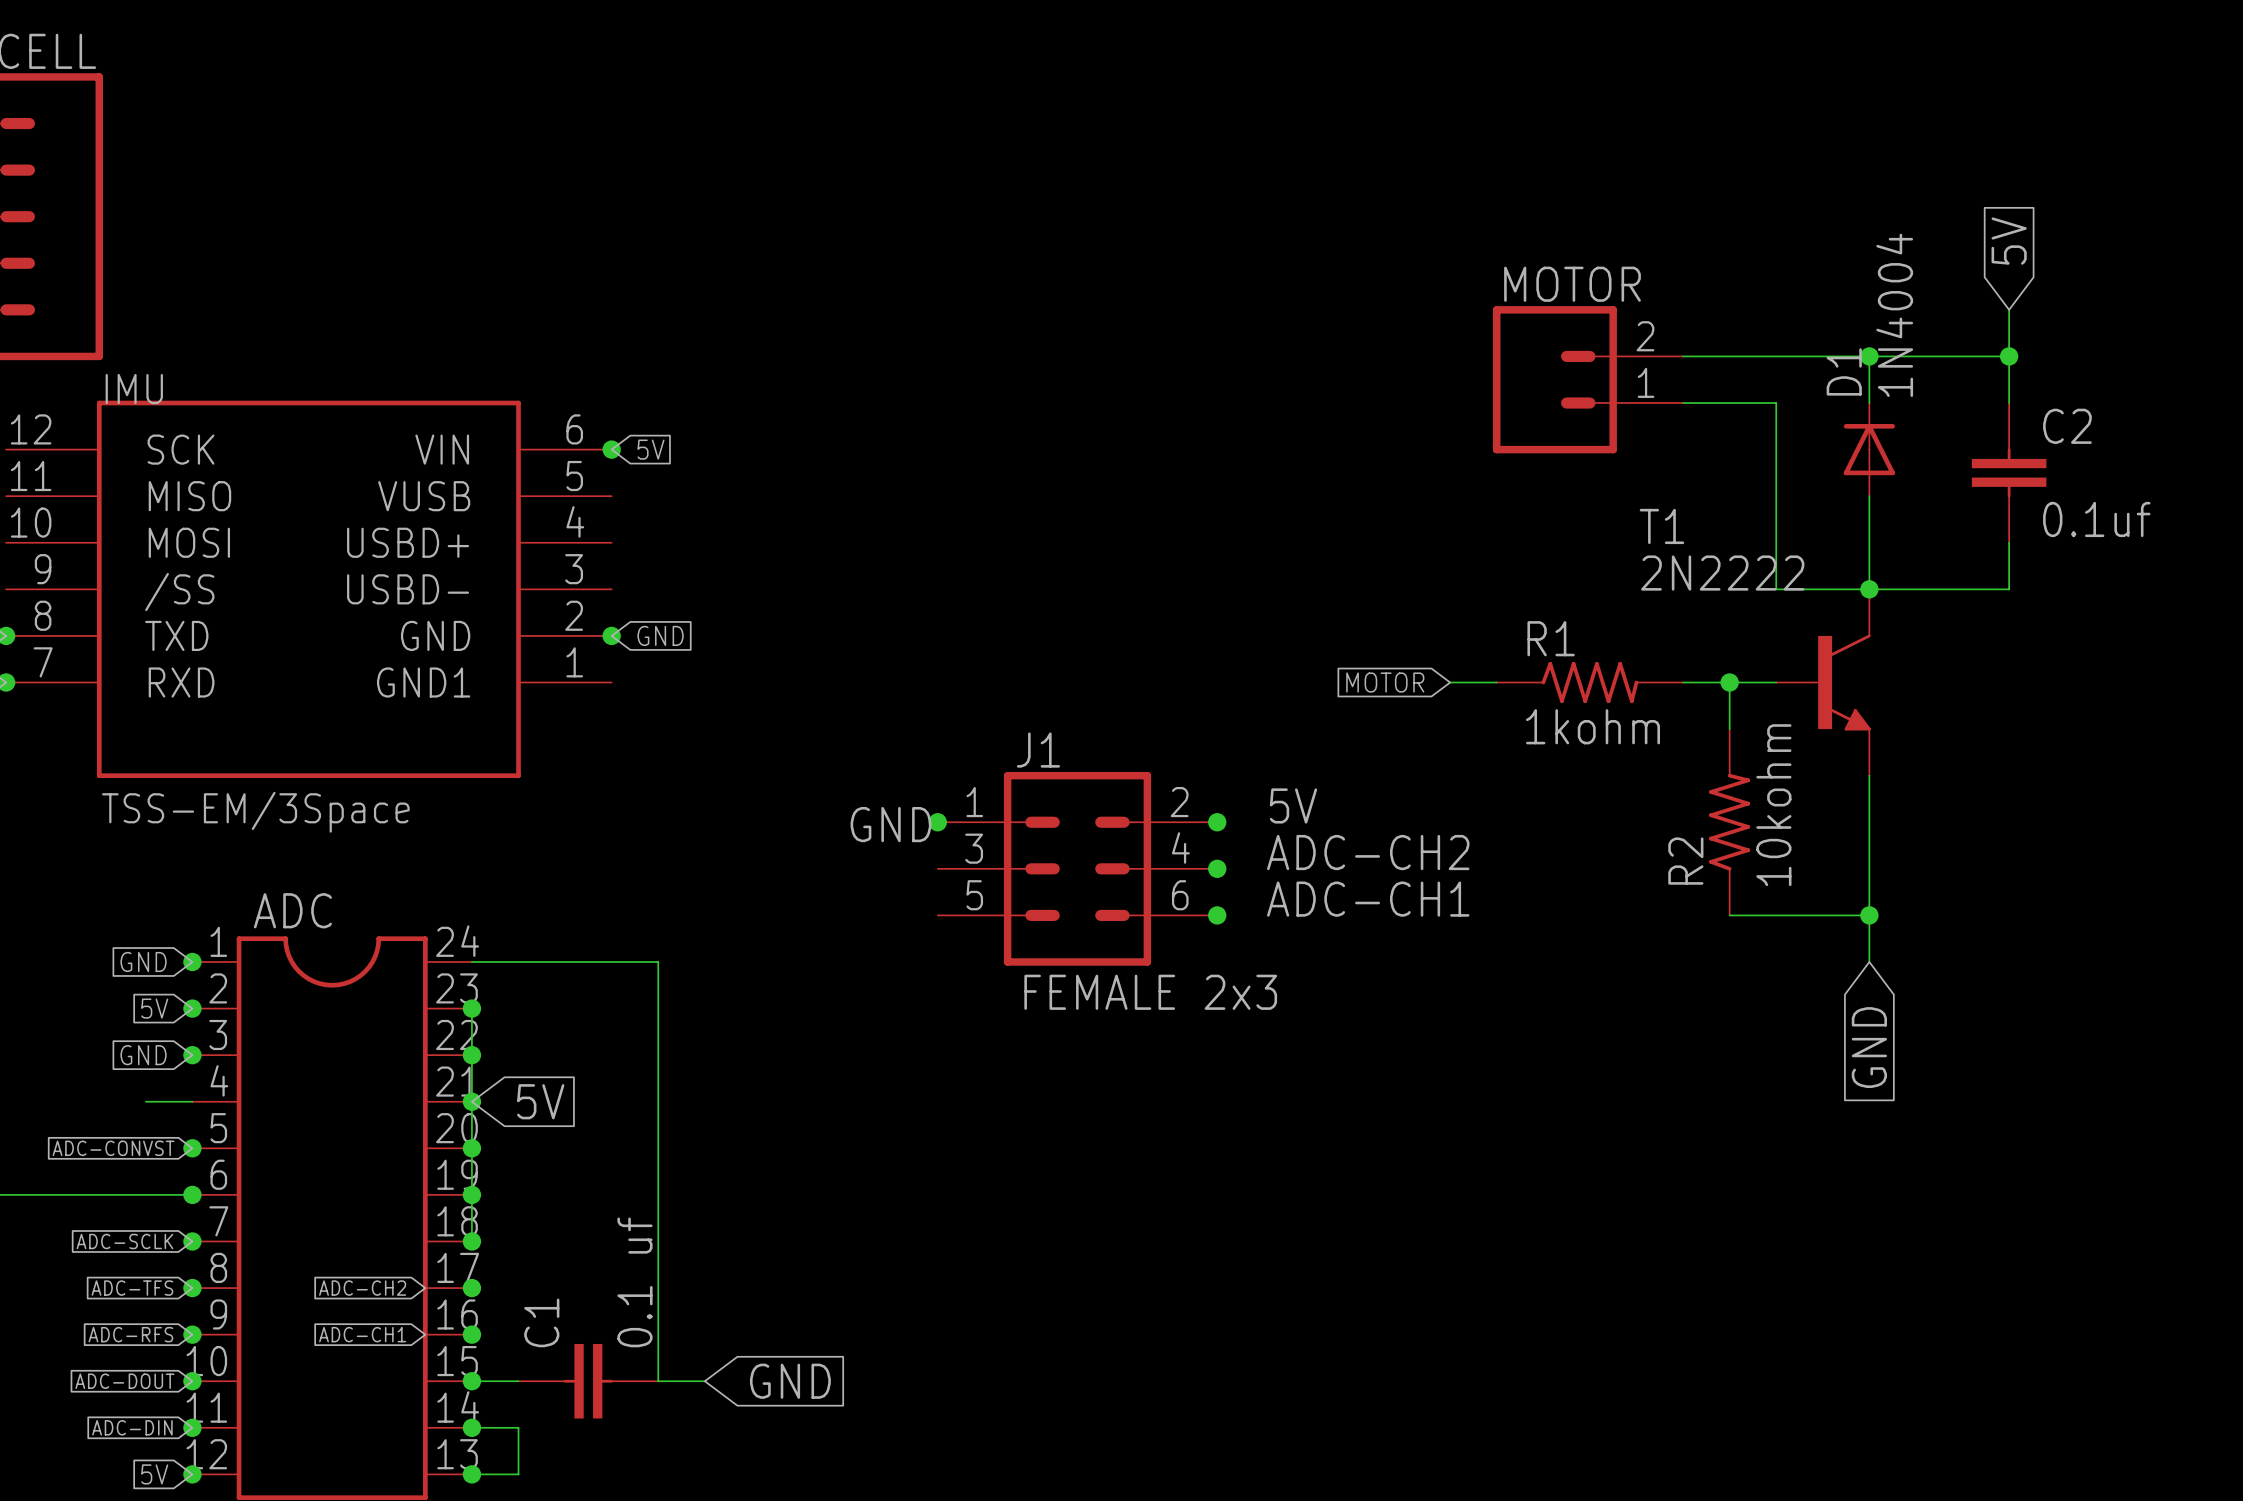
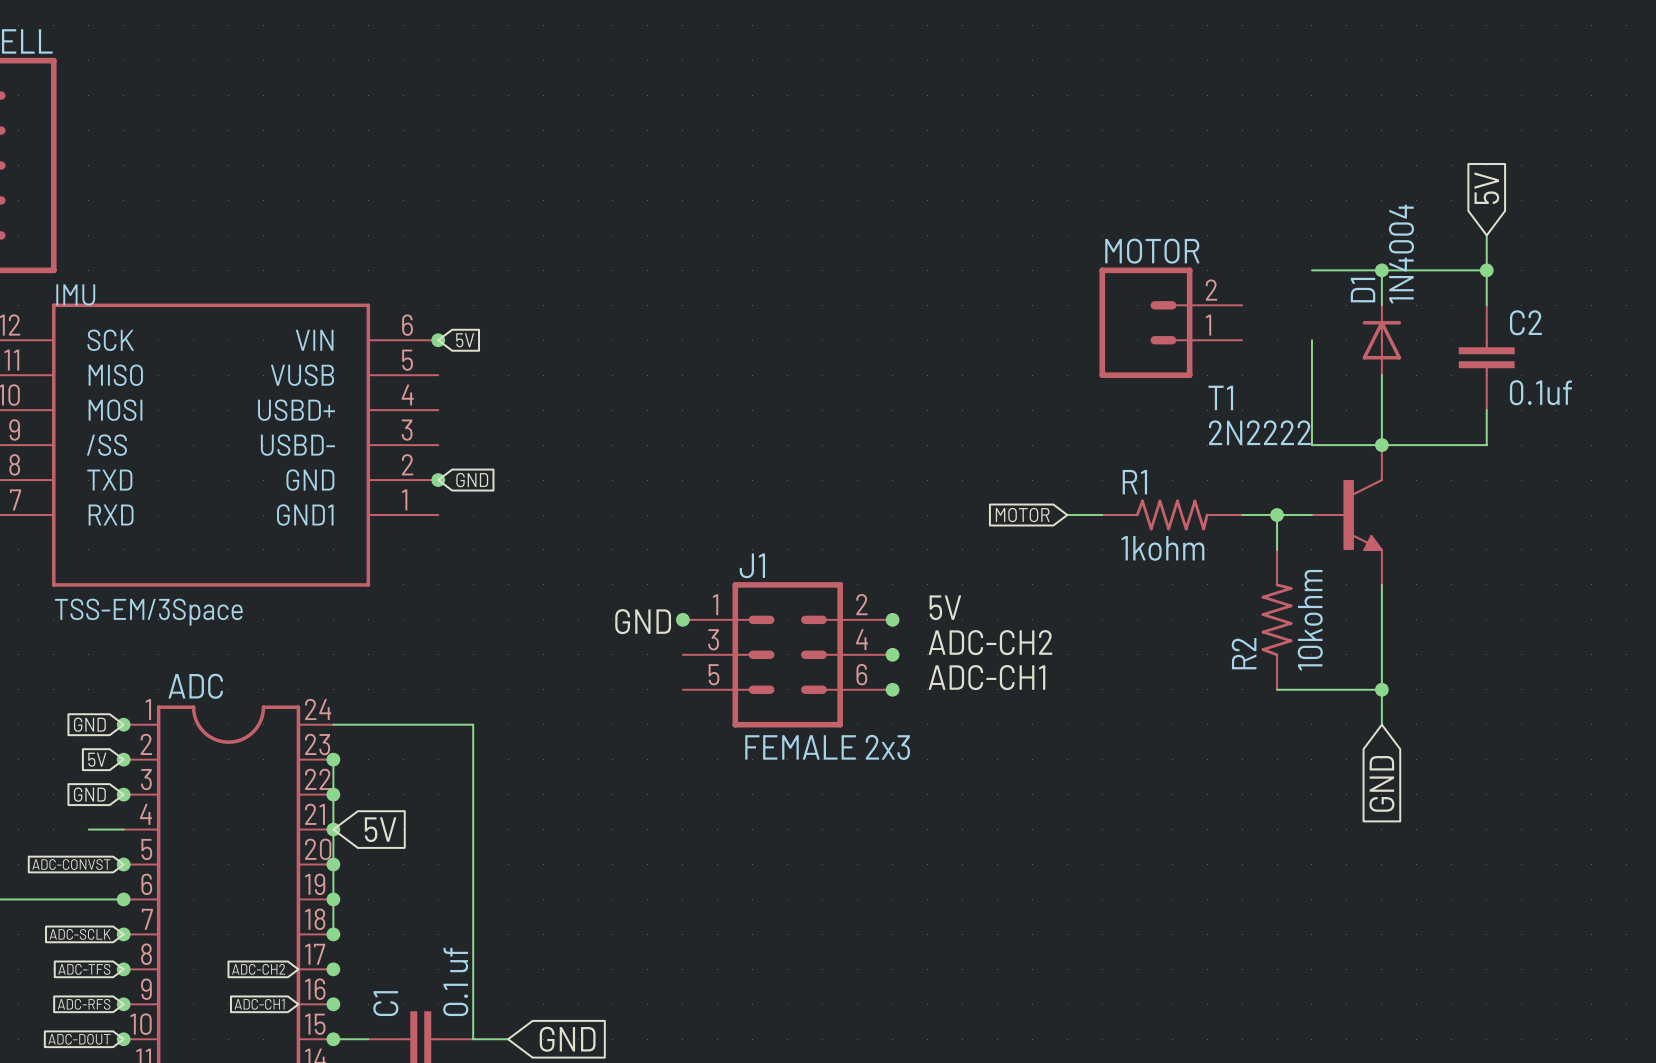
wire: (1683, 356) (1776, 356) -> none
MOTOR position: (1588, 379) -> (1170, 322)
wire: (1683, 403) (1776, 403) (1776, 449) -> none

